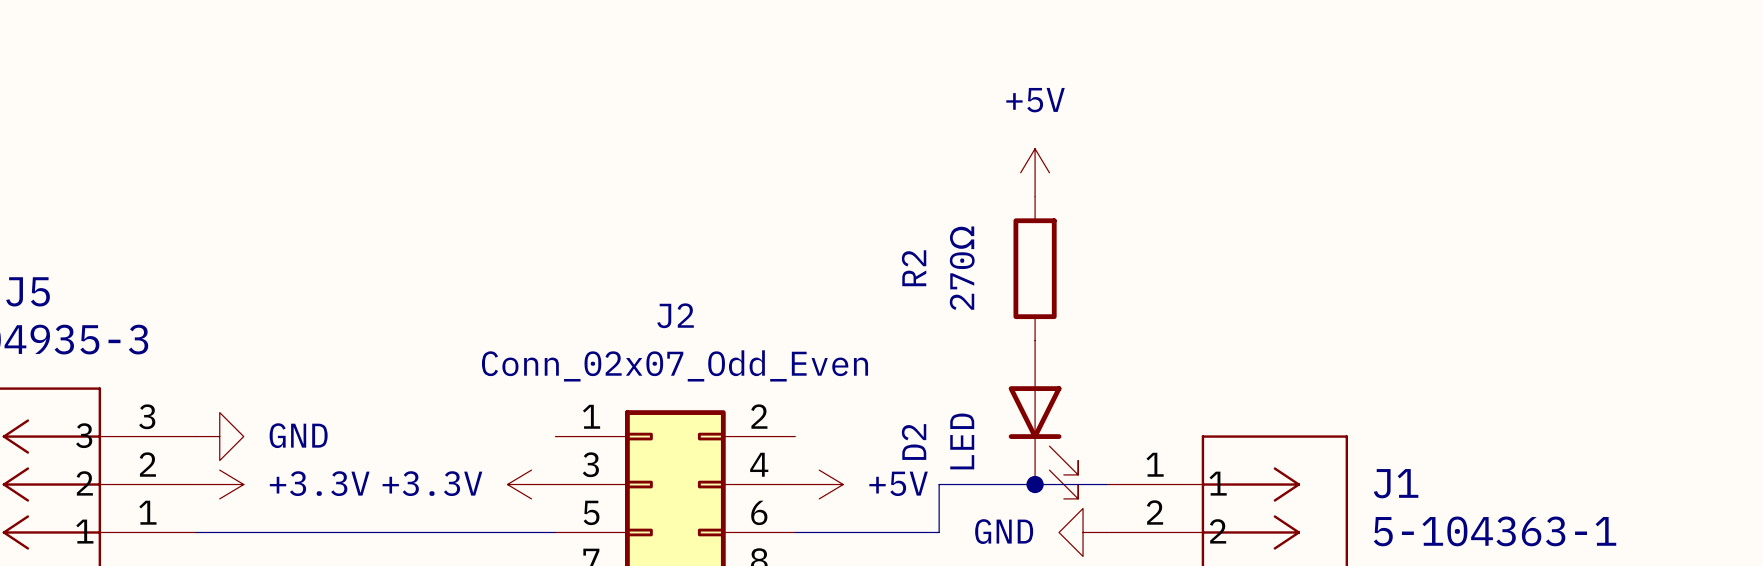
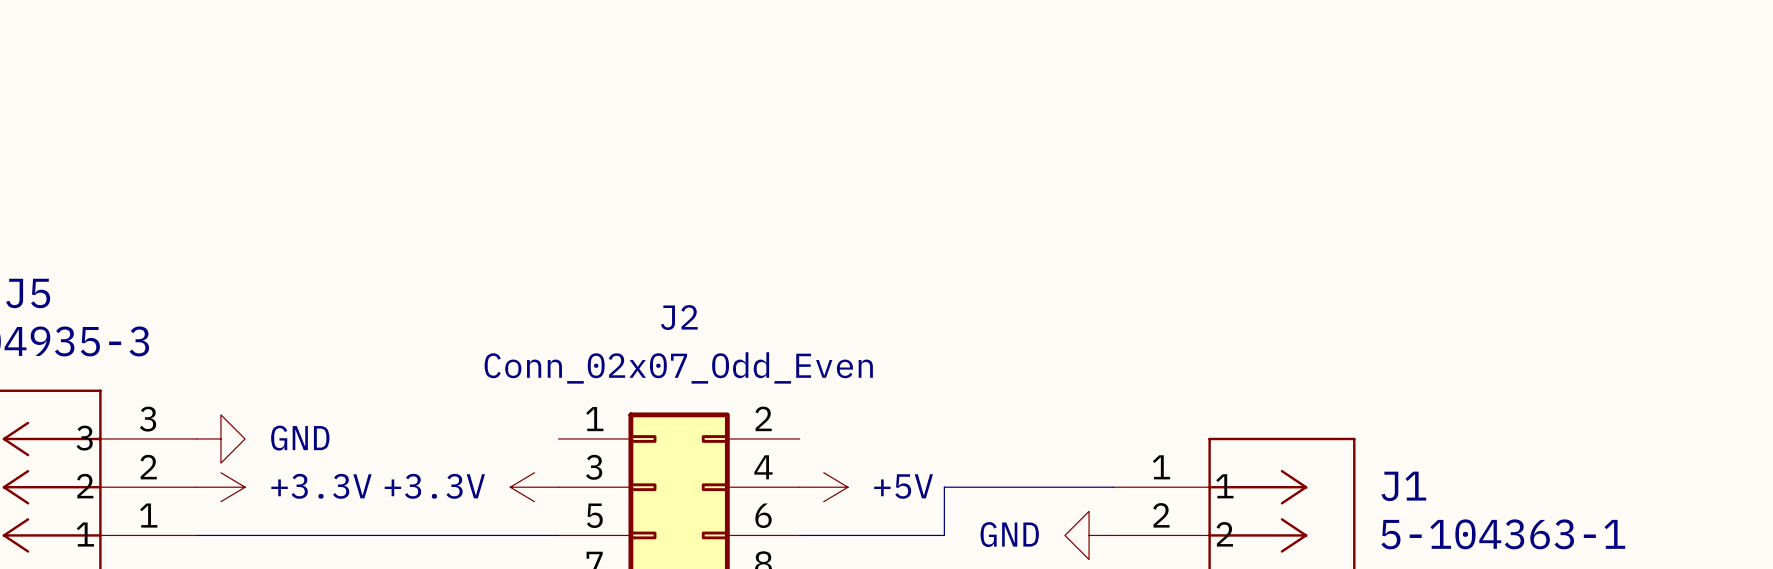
power symbol: +5V (1035, 172) -> none
R2: 270Ω (1035, 268) -> none
D2: LED (1043, 419) -> none
junction: (1035, 484) -> none

